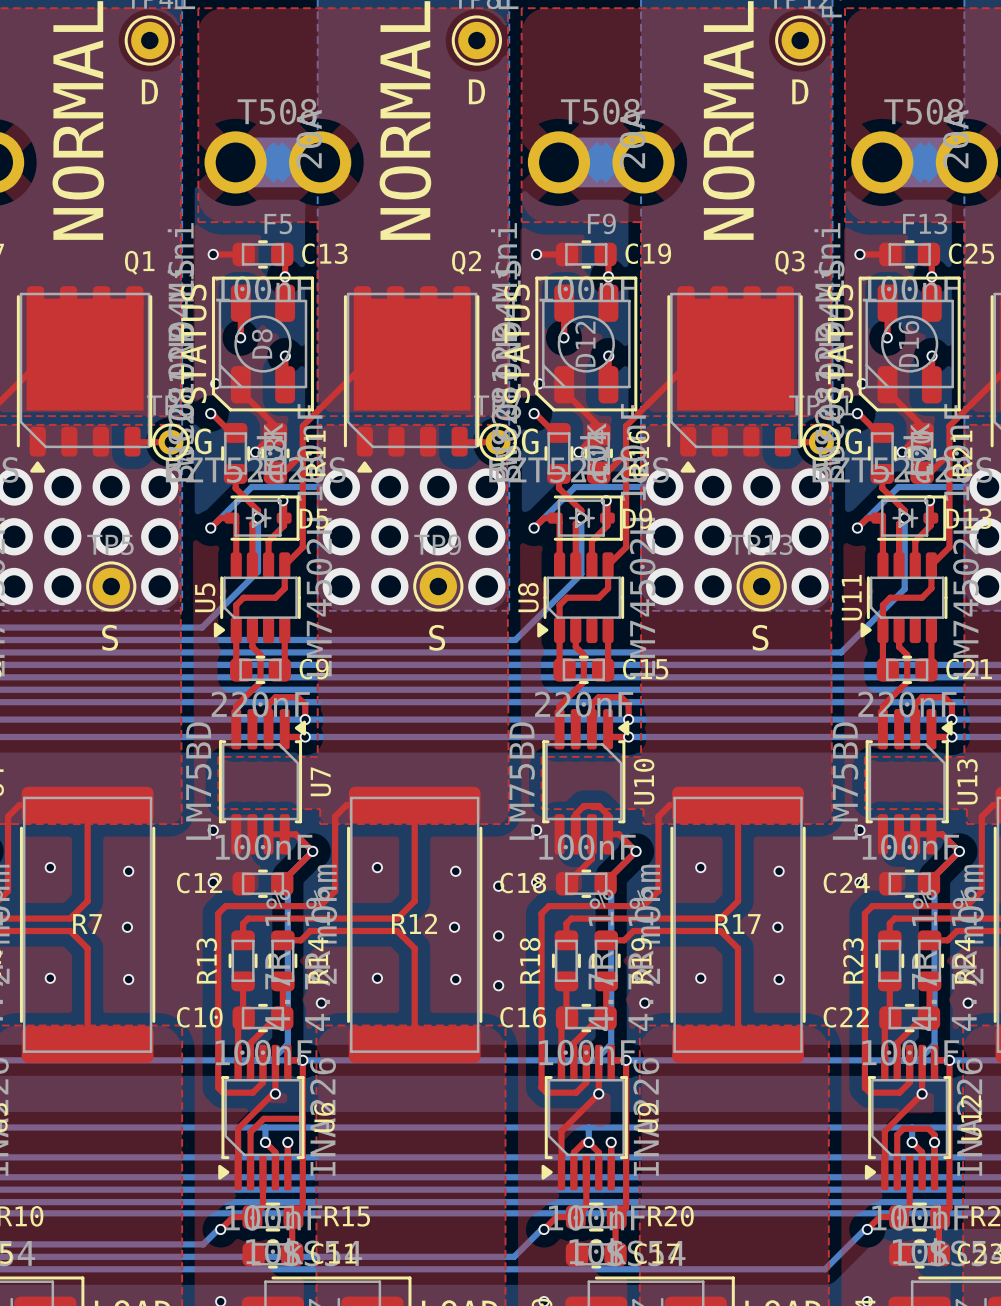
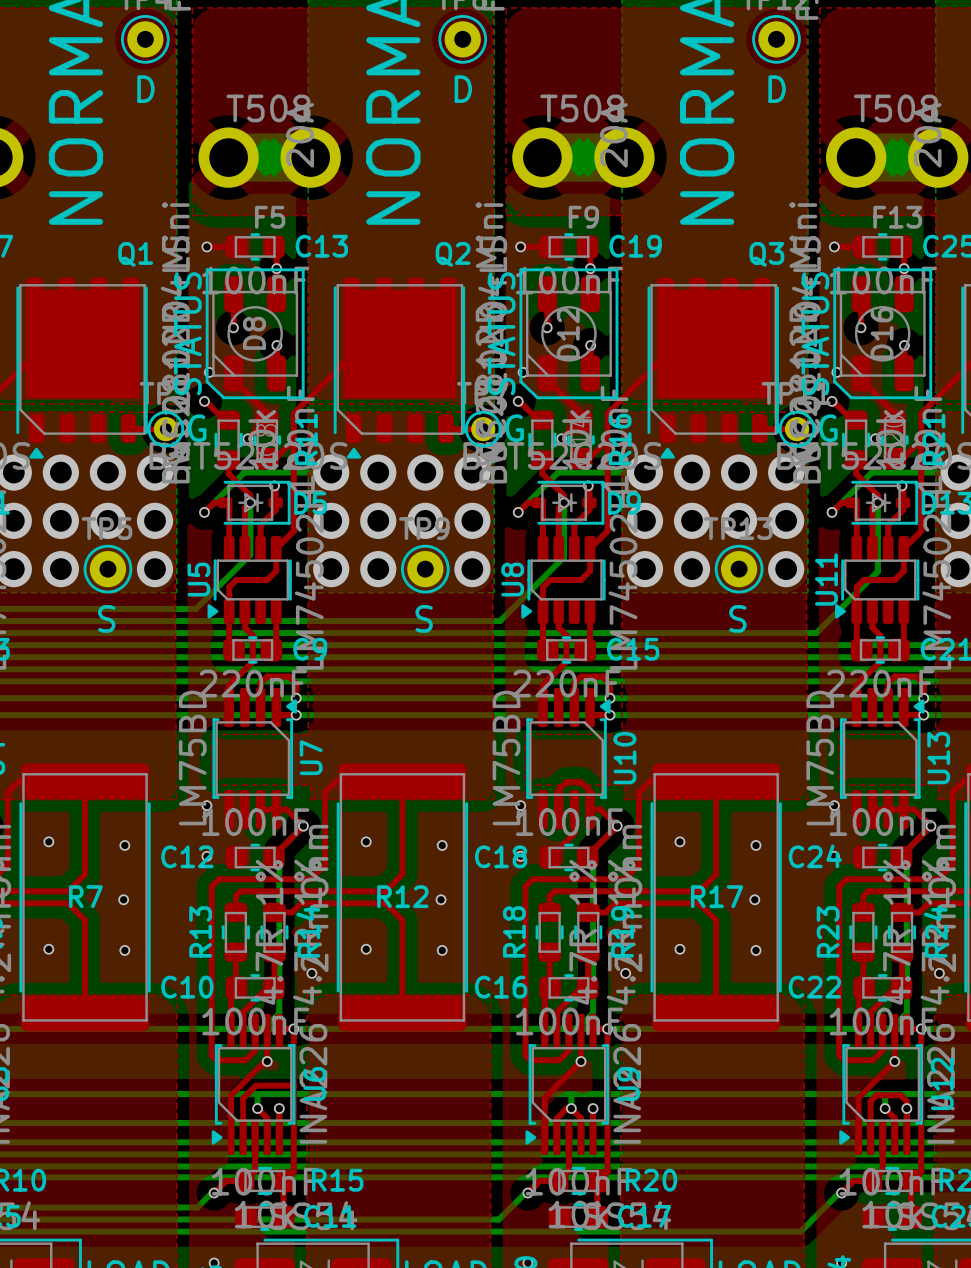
via: (498, 886) -> none
via: (498, 935) -> none
via: (498, 985) -> none

